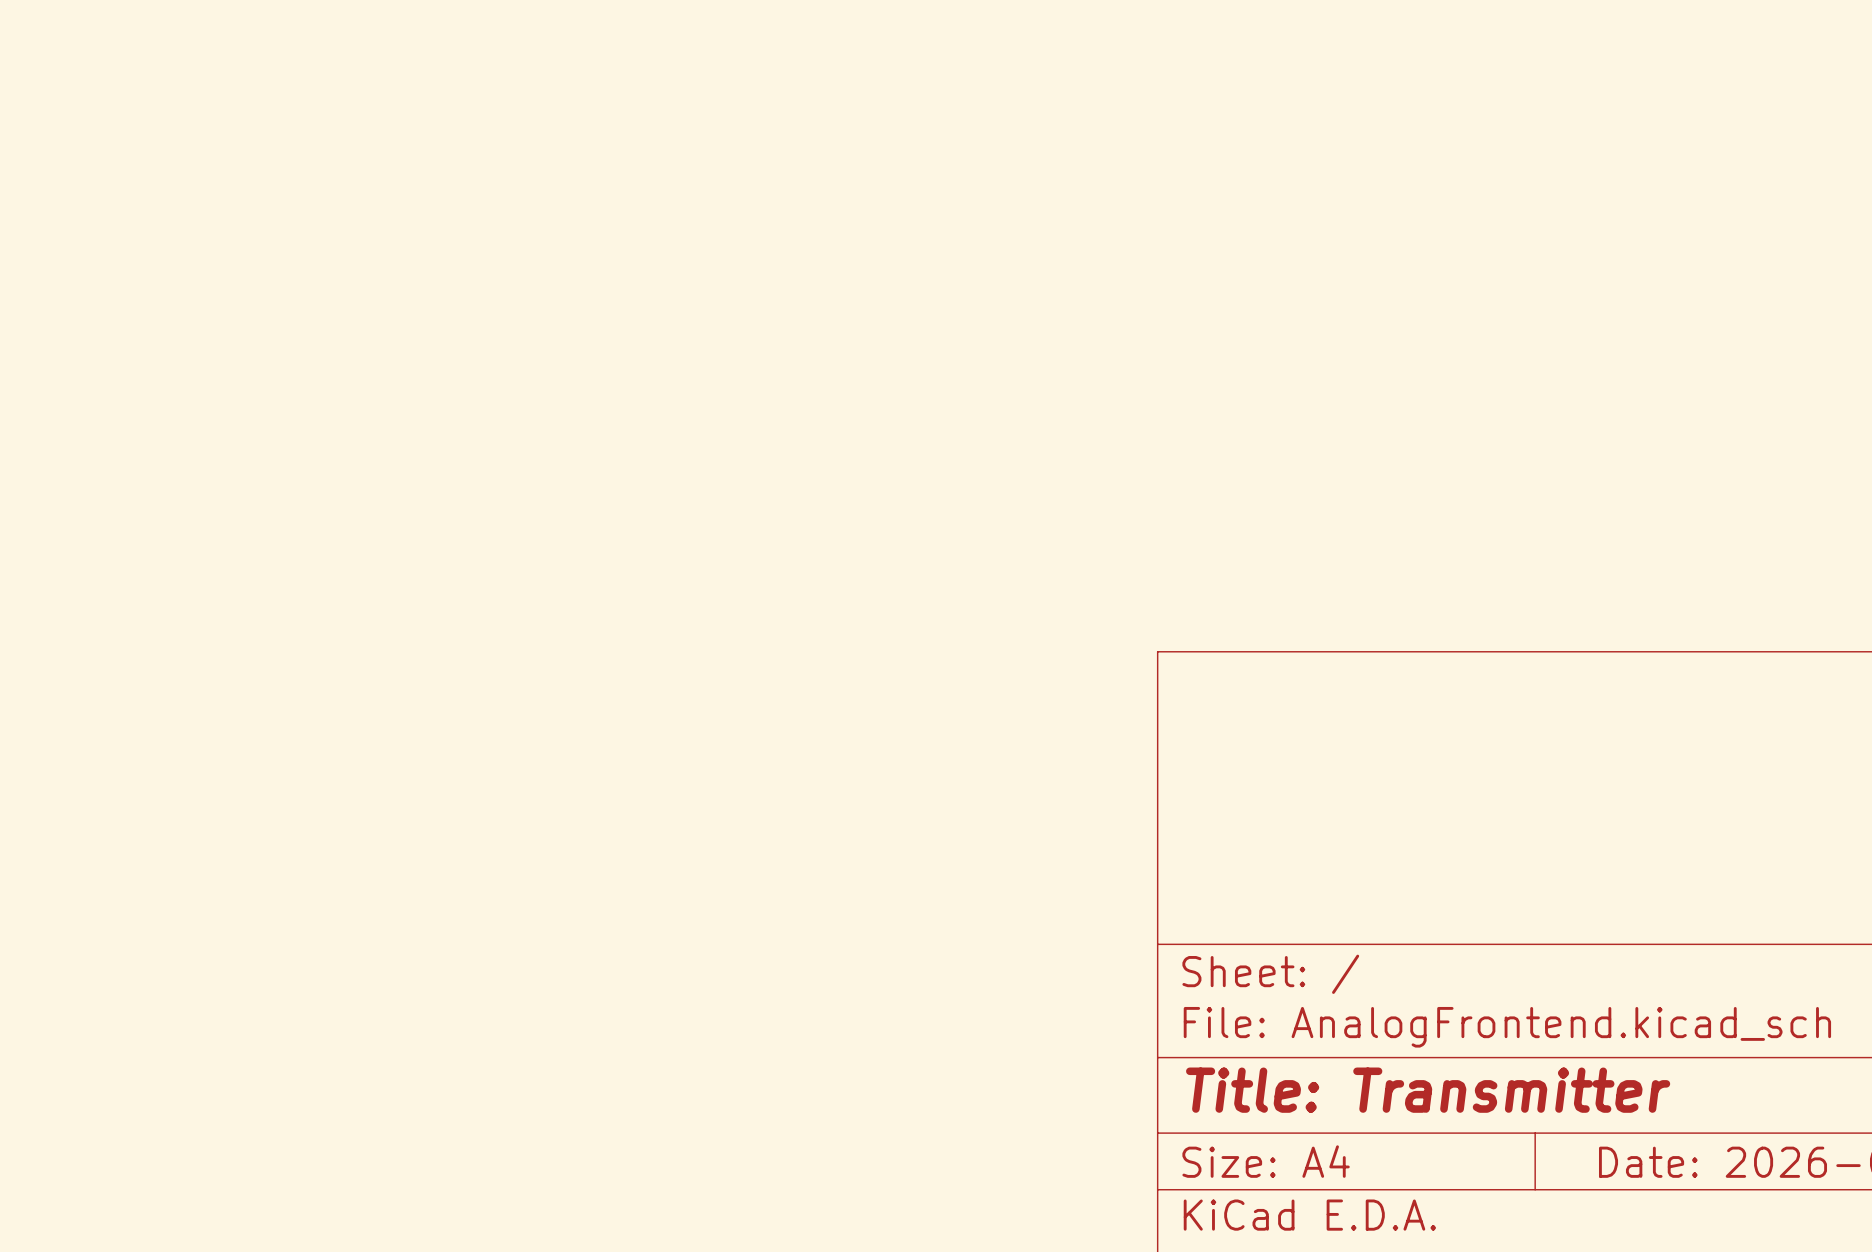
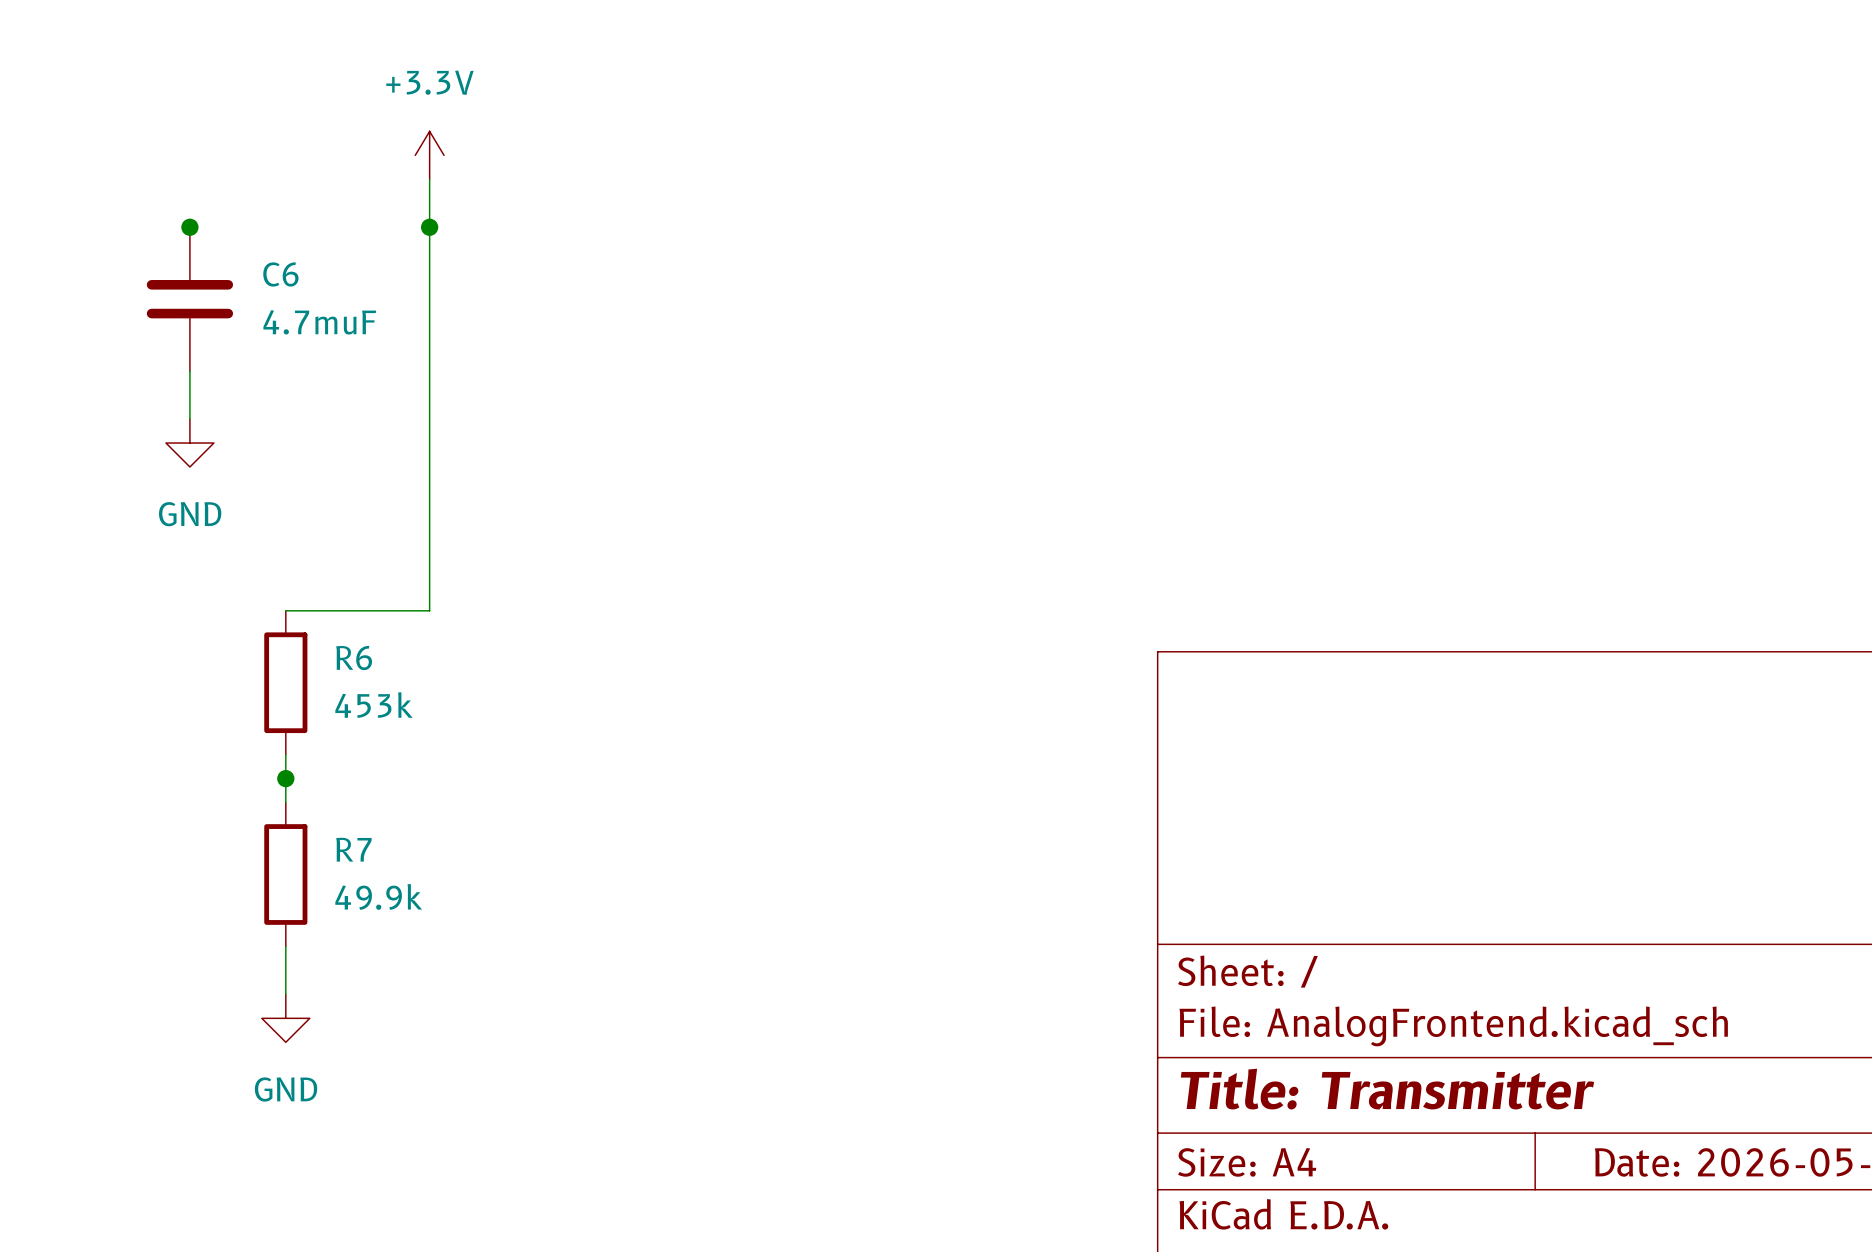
power symbol: none -> +3.3V (429, 155)
wire: none -> (429, 179) (429, 610) (285, 610)
junction: none -> (189, 227)
junction: none -> (429, 227)
C6: none -> 4.7muF (189, 299)
wire: none -> (189, 371) (189, 419)
power symbol: none -> GND (189, 443)
R6: none -> 453k (285, 682)
wire: none -> (285, 754) (285, 802)
junction: none -> (285, 778)
R7: none -> 49.9k (285, 874)
wire: none -> (285, 946) (285, 994)
power symbol: none -> GND (285, 1018)

